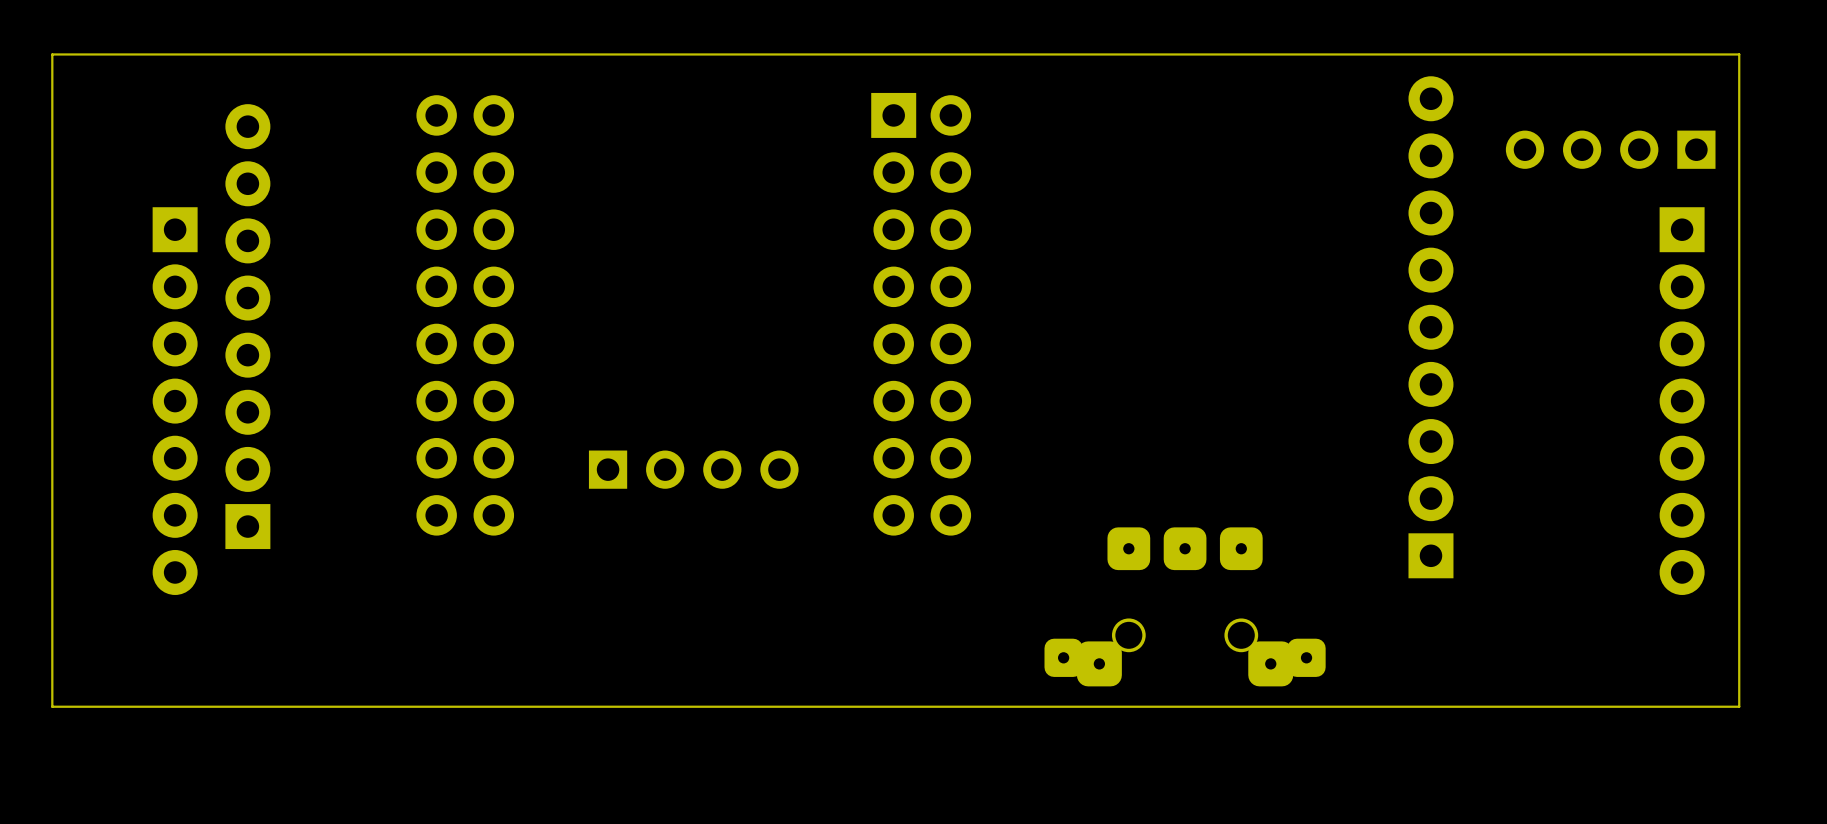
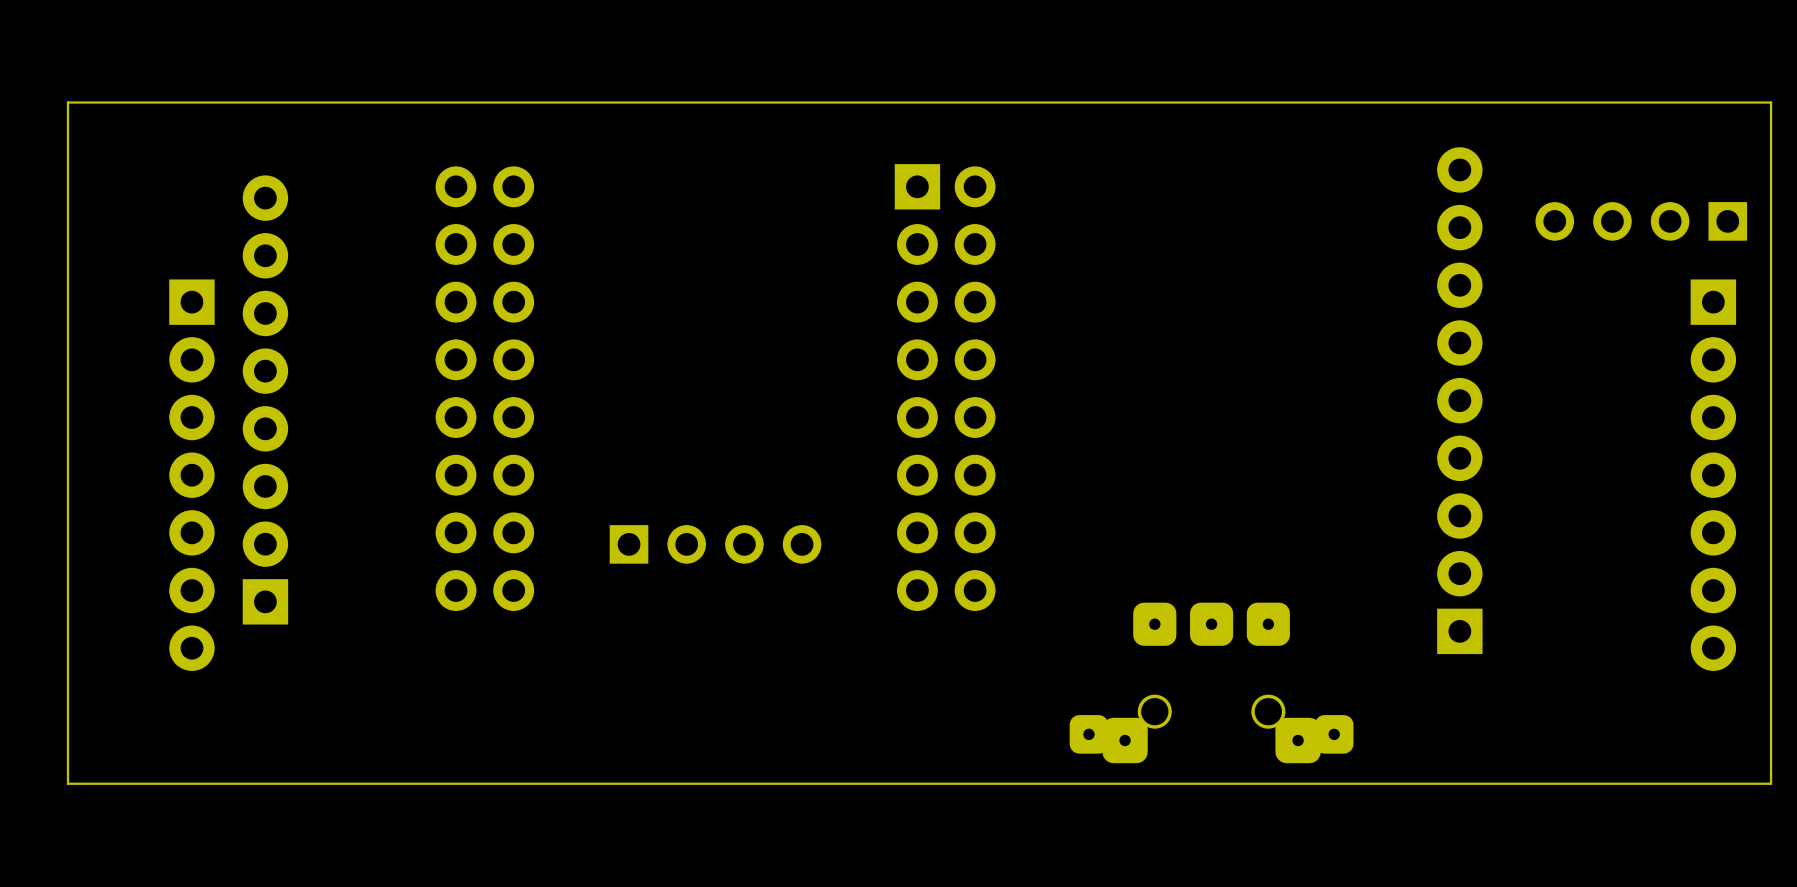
board edge: (1739, 54) (52, 54) -> (1771, 125) (1771, 102) (67, 102) (67, 125)

